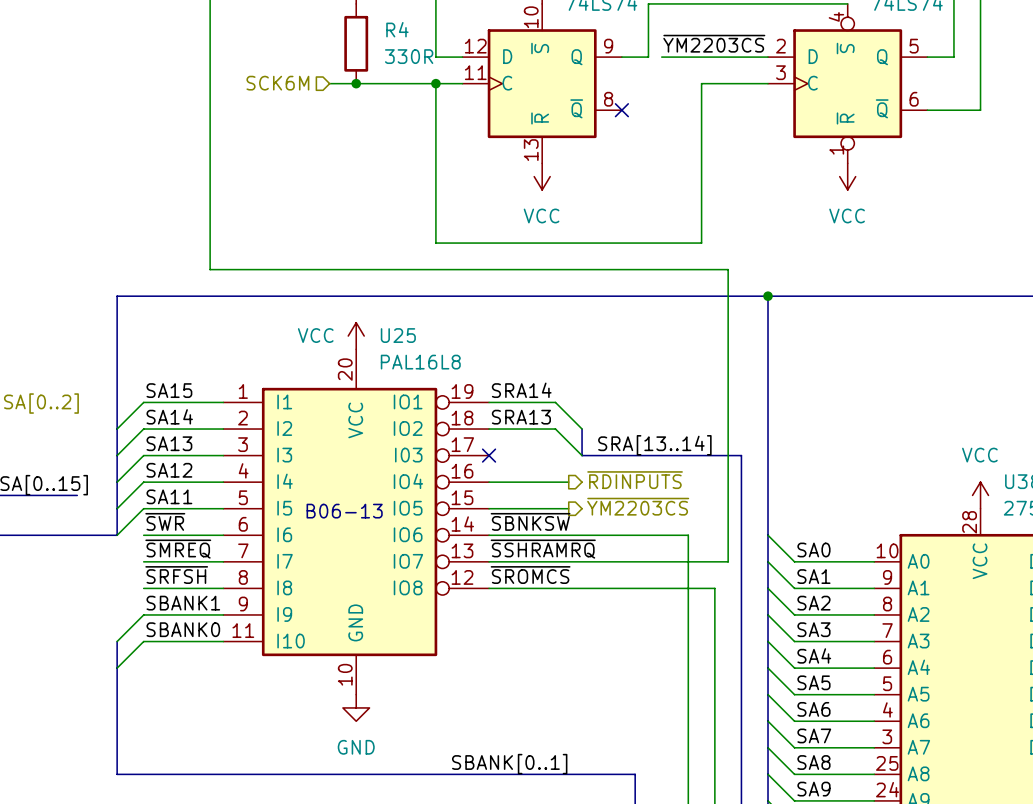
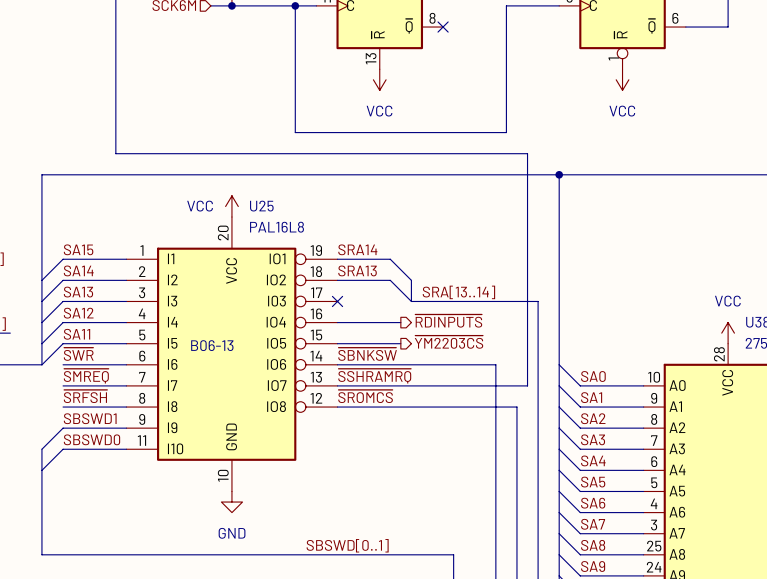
label: SBANK1 (183, 603) -> SBSWD1 (90, 418)
label: SBANK0 (183, 629) -> SBSWD0 (92, 439)
label: SBANK[0..1] (509, 764) -> SBSWD[0..1] (347, 545)

